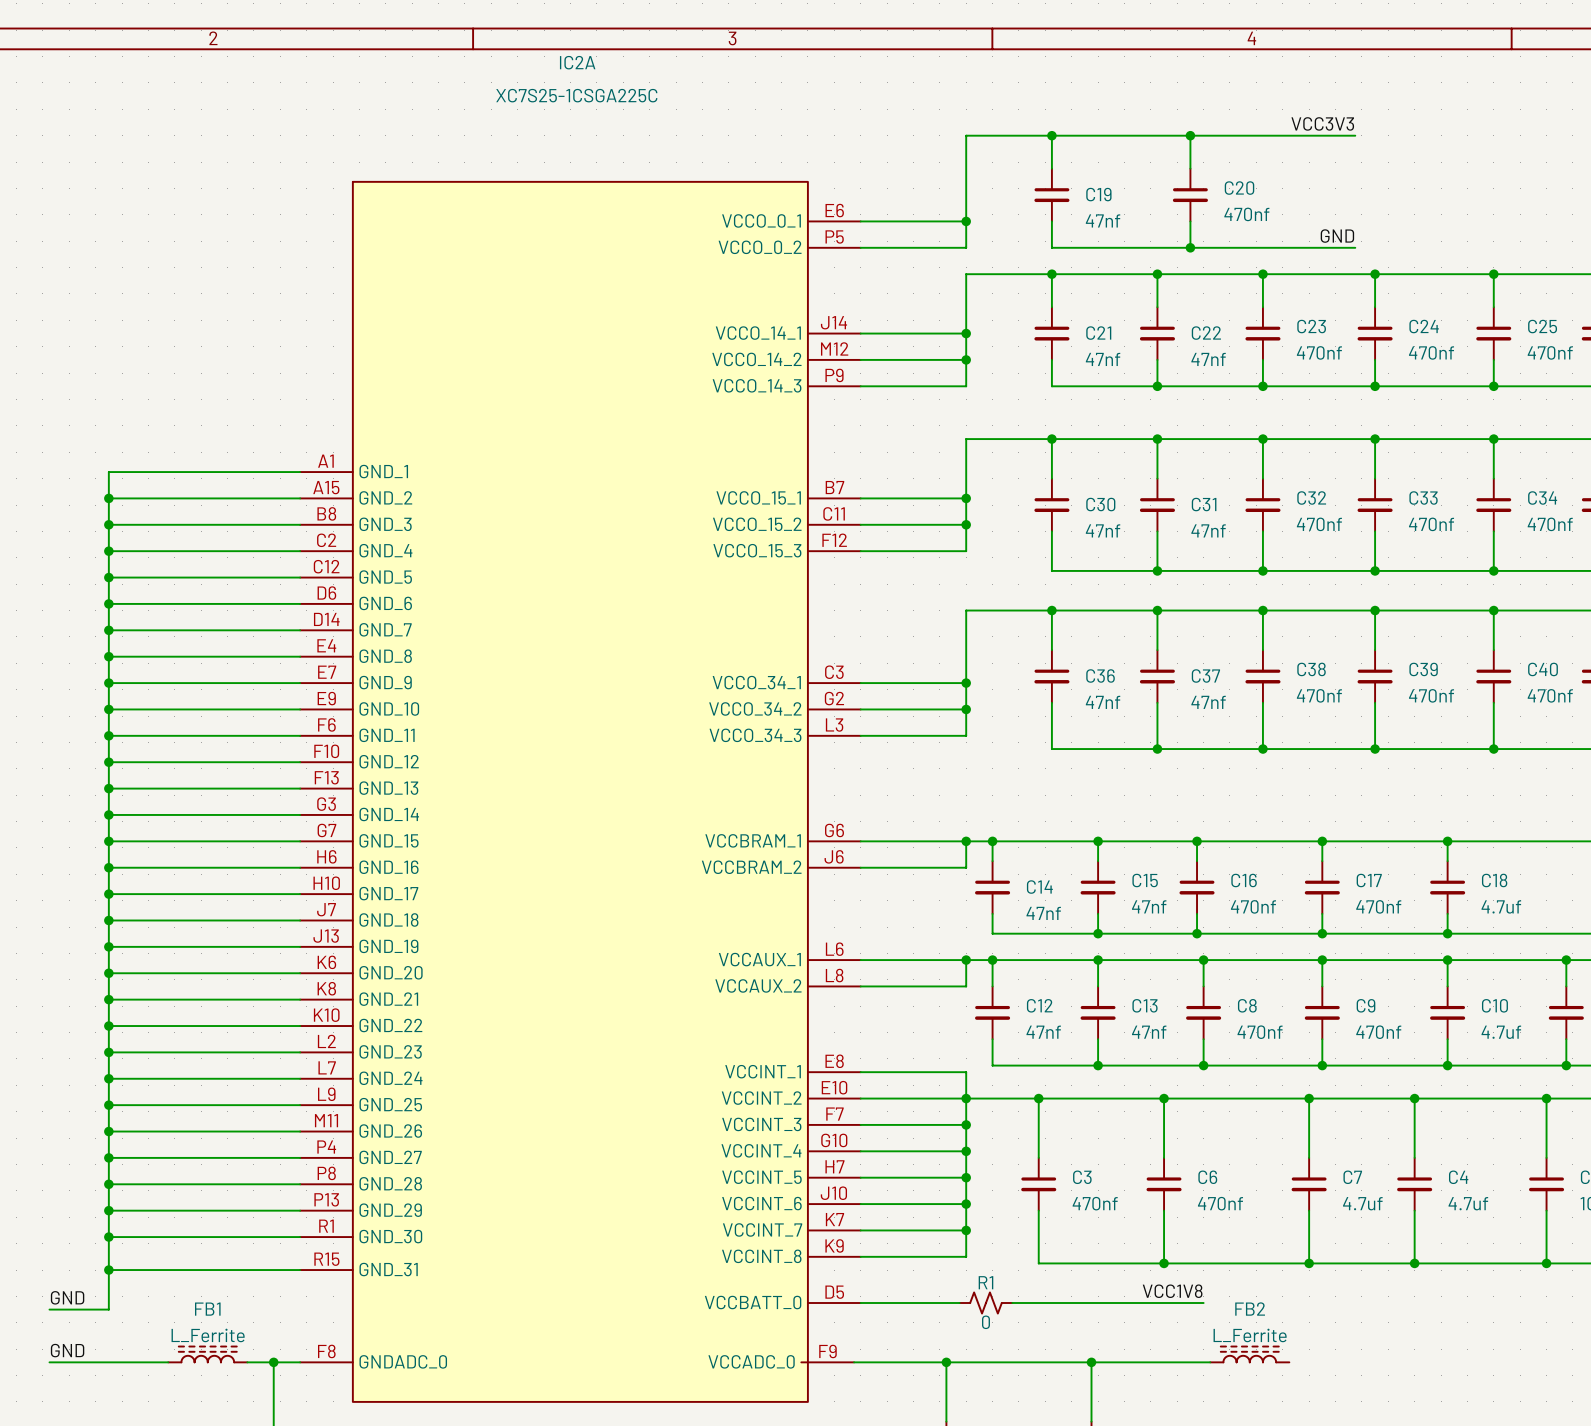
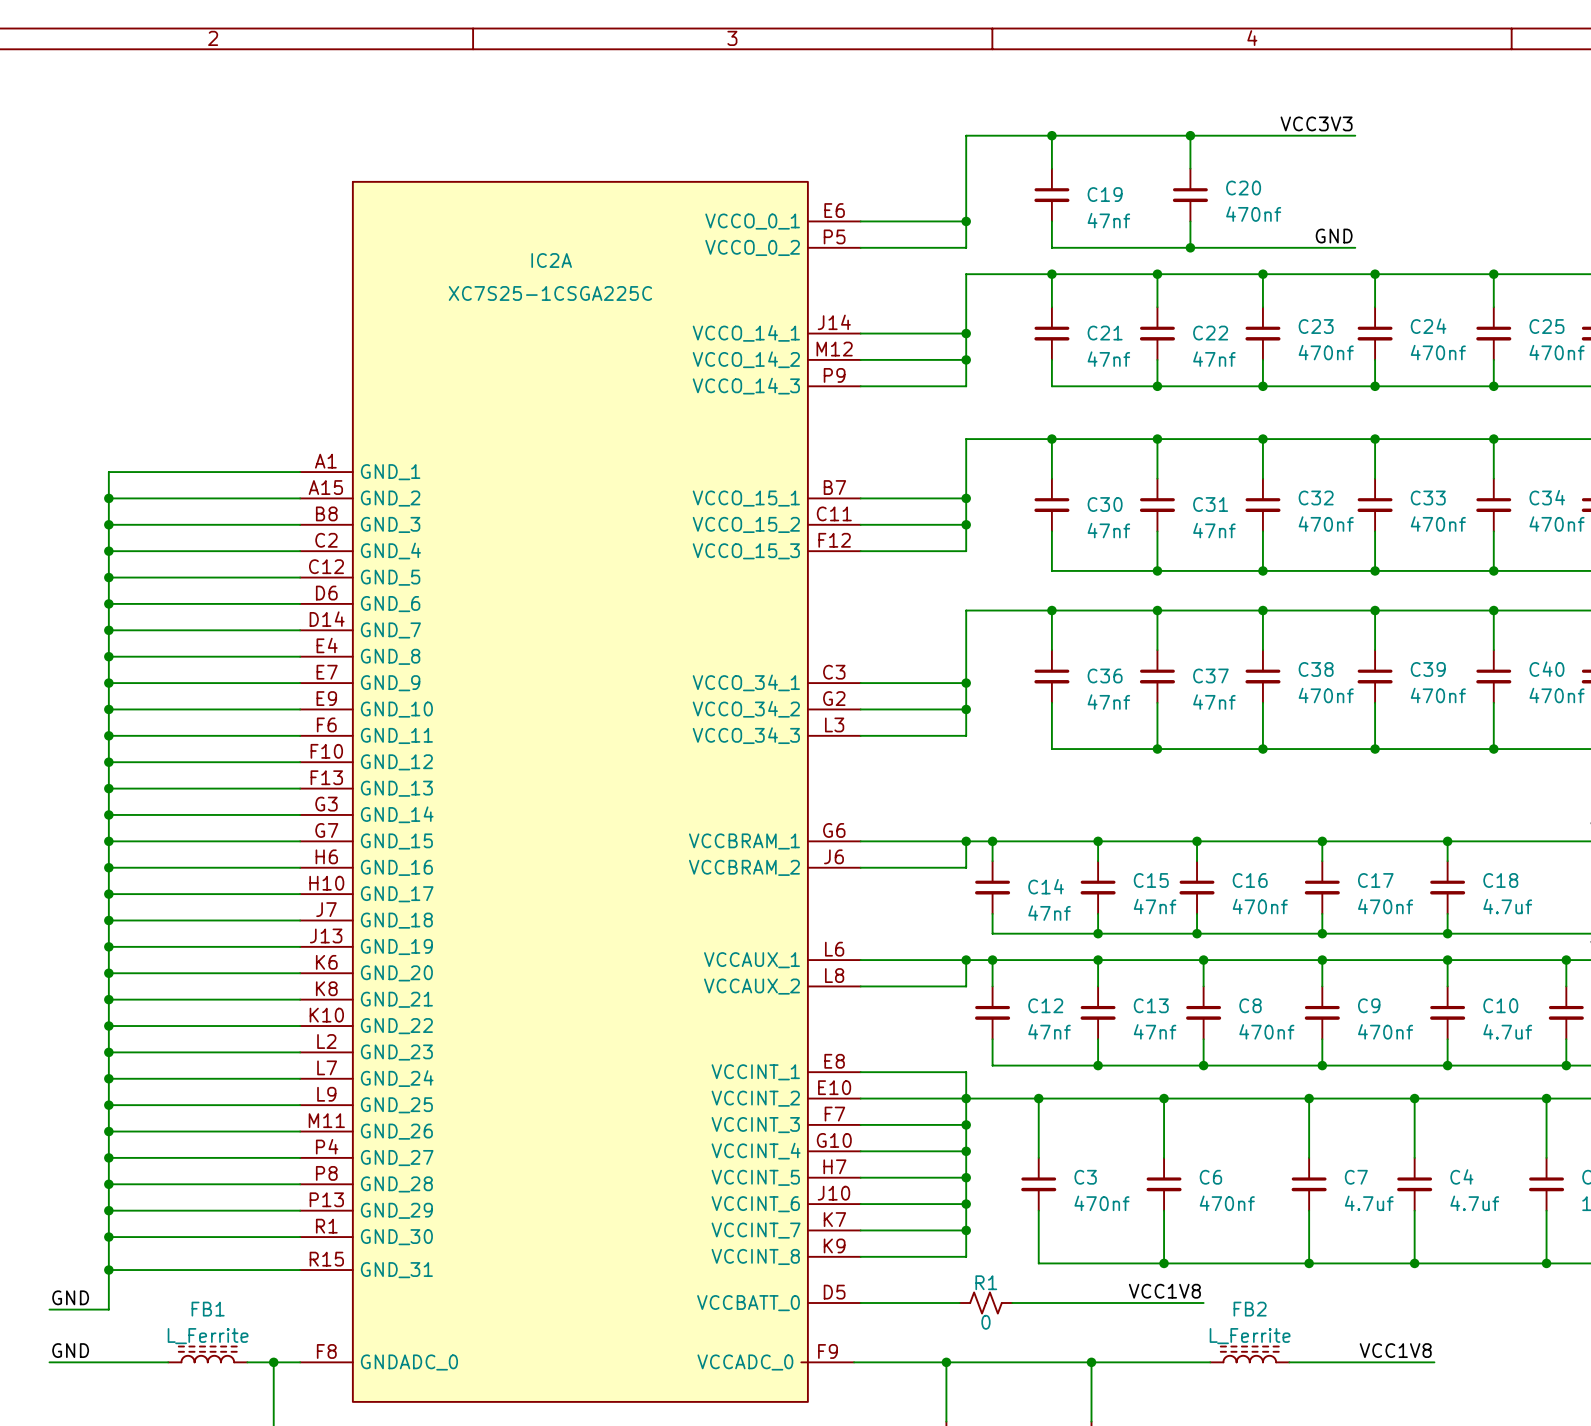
IC2A name position: IC2A (577, 62) -> IC2A (551, 260)
IC2A value position: XC7S25-1CSGA225C (576, 95) -> XC7S25-1CSGA225C (550, 293)
label: none -> VCC1V8 (1395, 1350)
wire: none -> (1289, 1362) (1434, 1362)

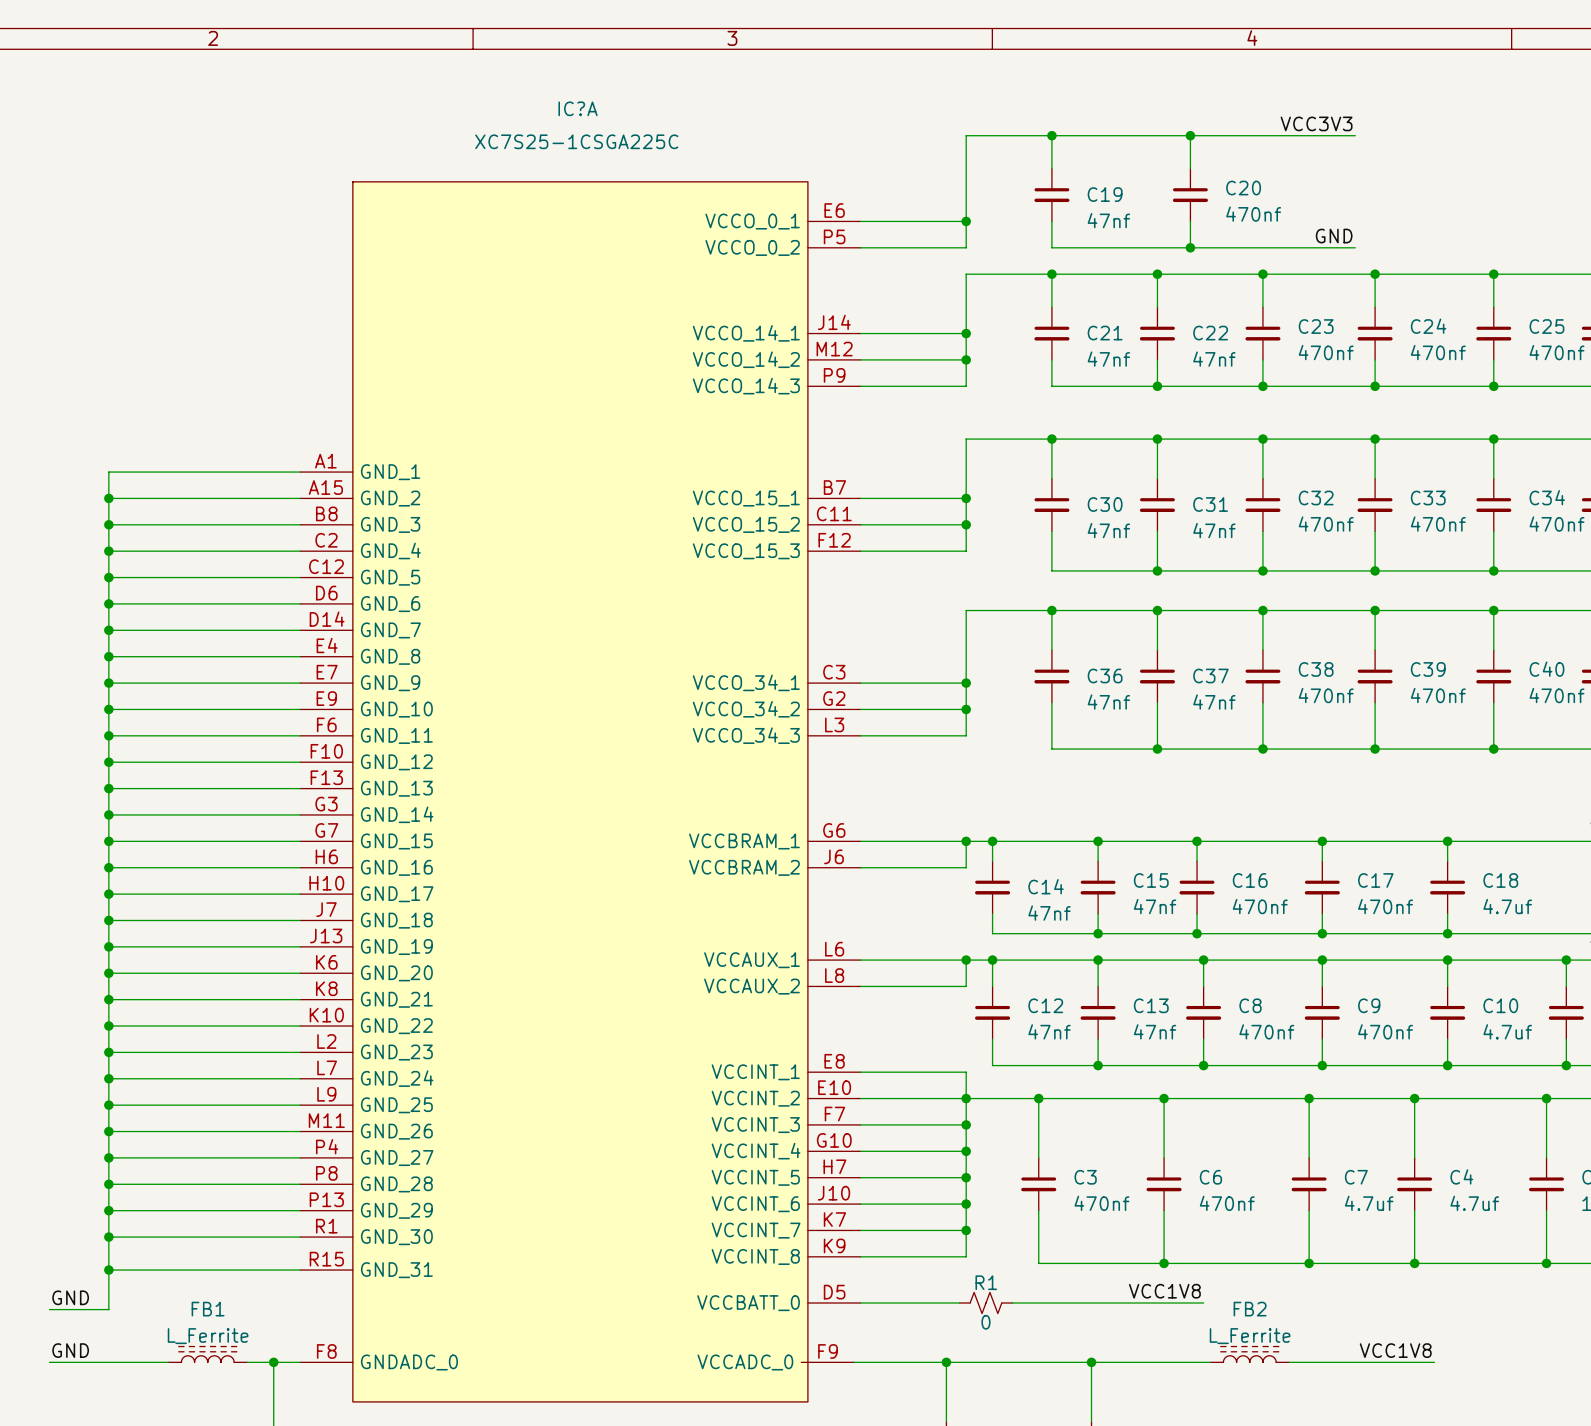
IC2A name: IC2A (551, 260) -> IC?A (578, 108)
IC2A value position: XC7S25-1CSGA225C (550, 293) -> XC7S25-1CSGA225C (576, 141)

